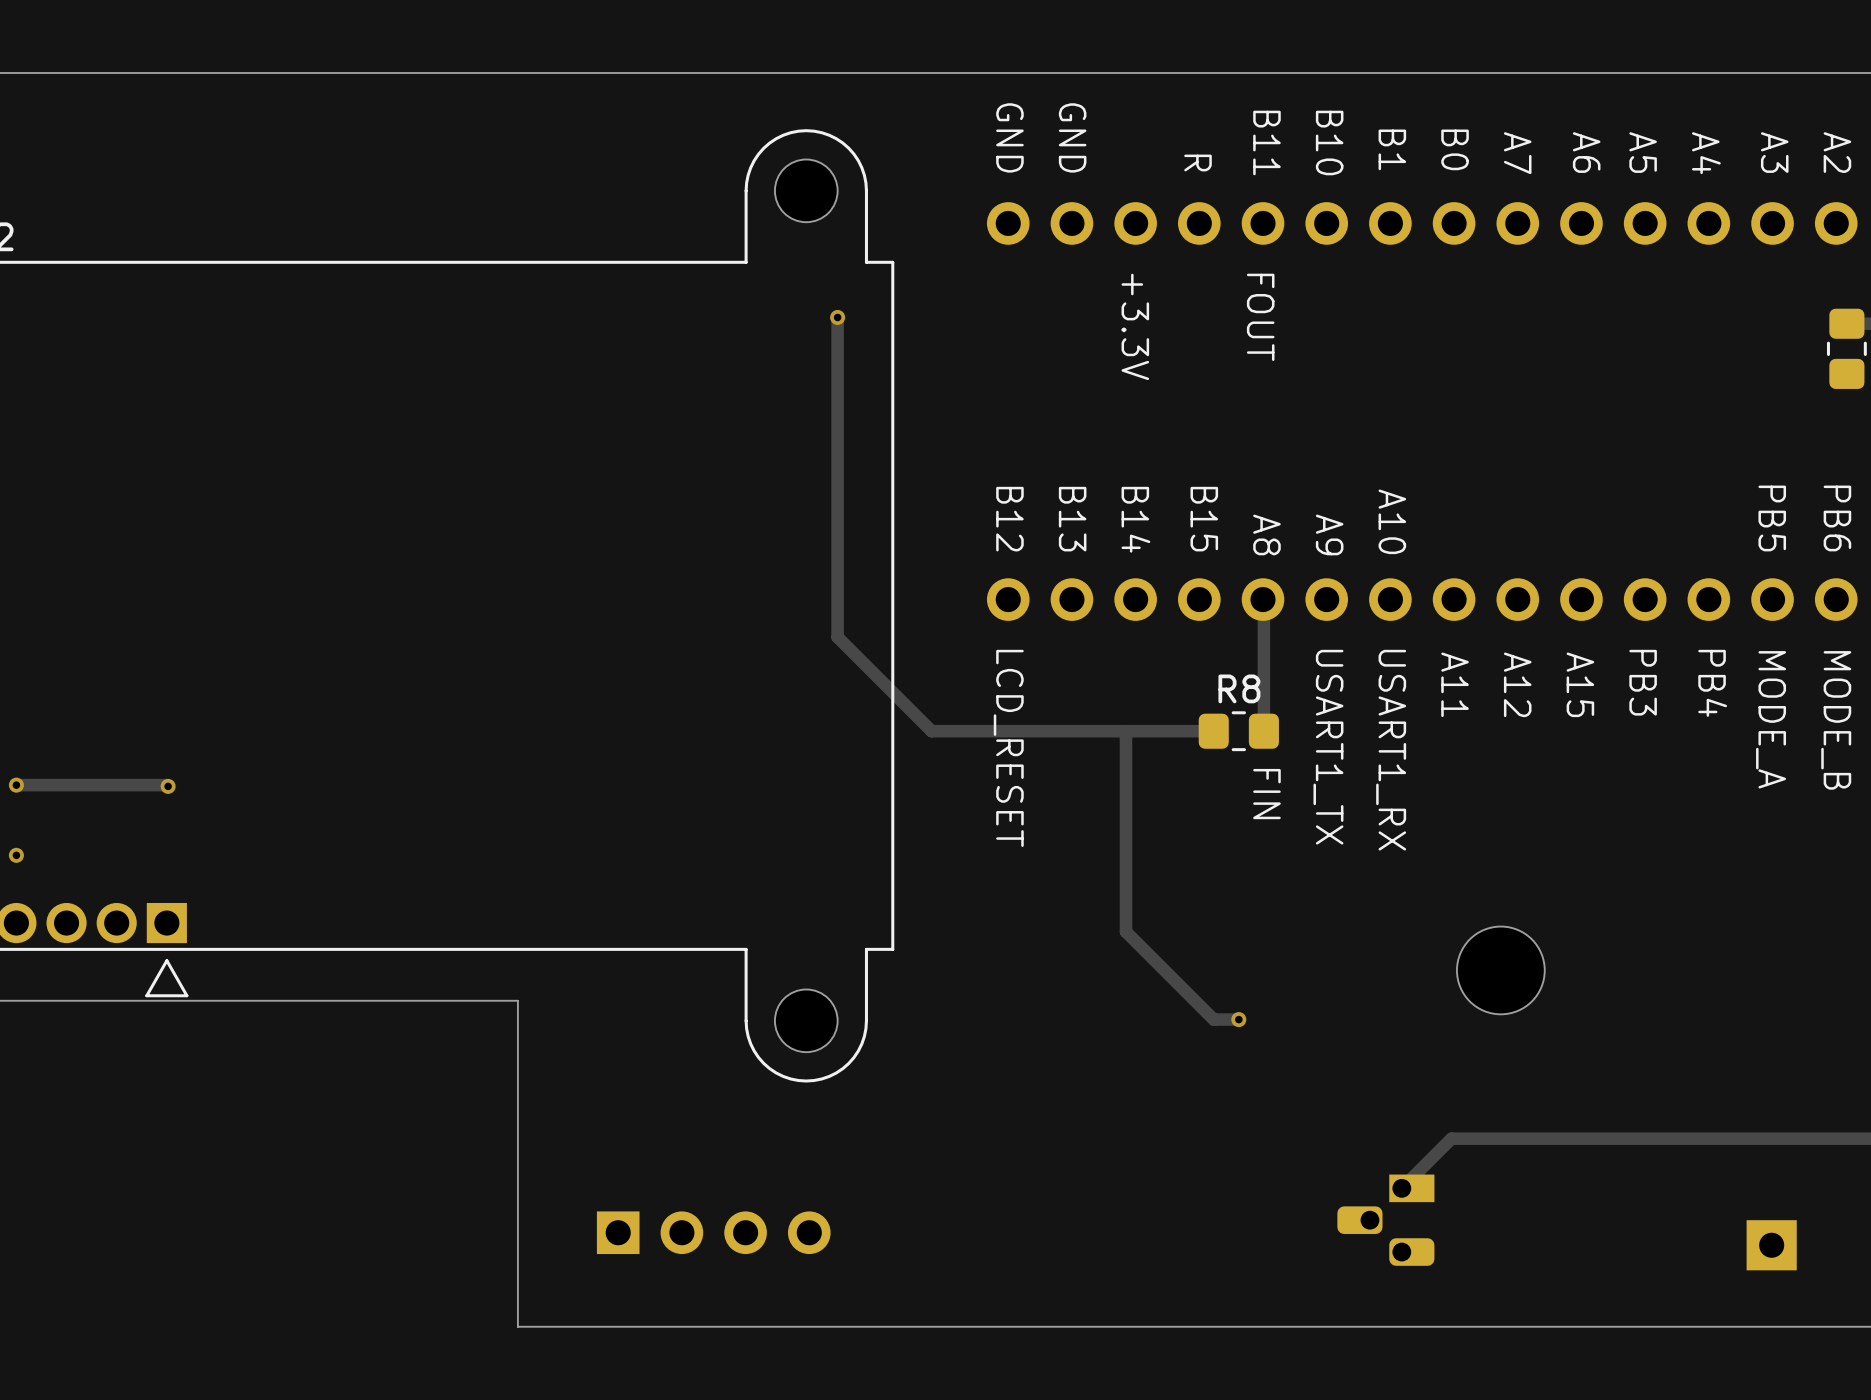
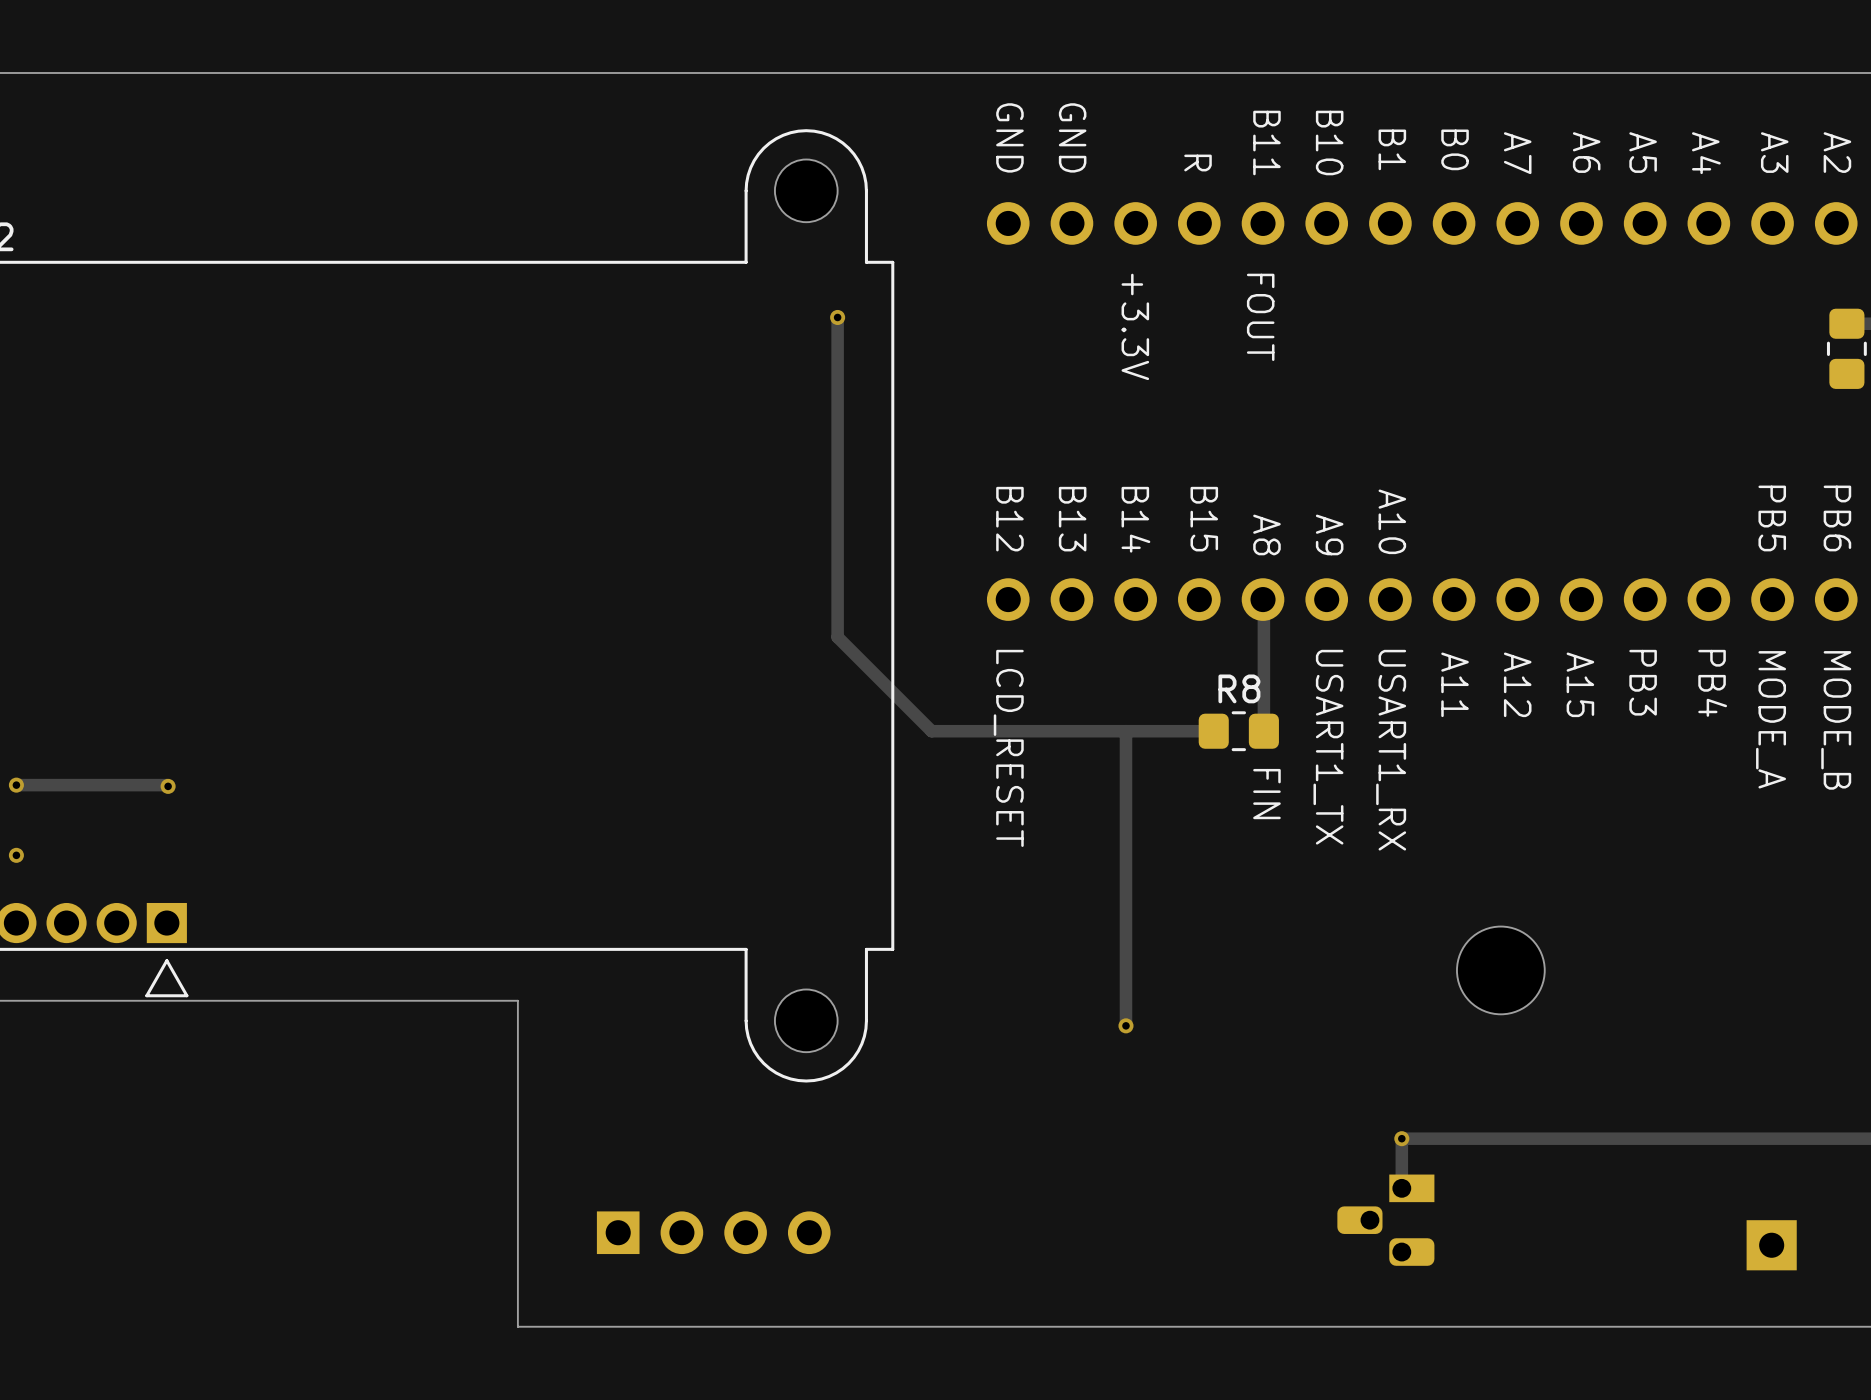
track: (1125, 931) (1213, 1019) (1238, 1019) -> (1125, 931) (1125, 1025)
via: (1238, 1019) -> none
via: none -> (1125, 1025)
via: none -> (1401, 1138)
track: (1451, 1138) (1401, 1188) -> (1451, 1138) (1401, 1138) (1401, 1188)

